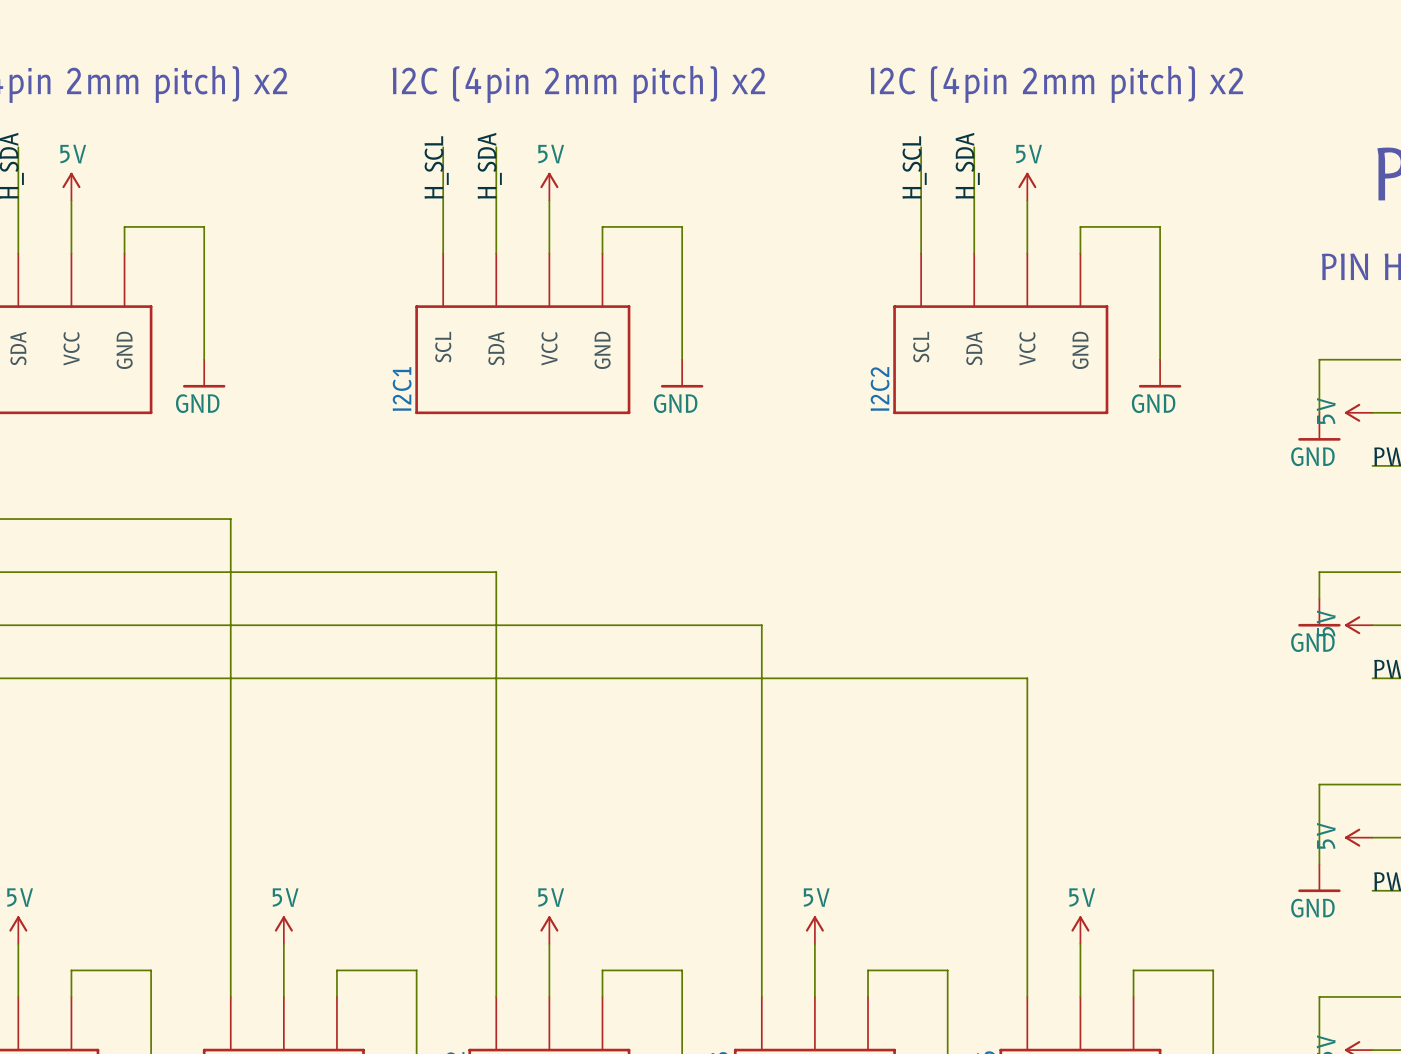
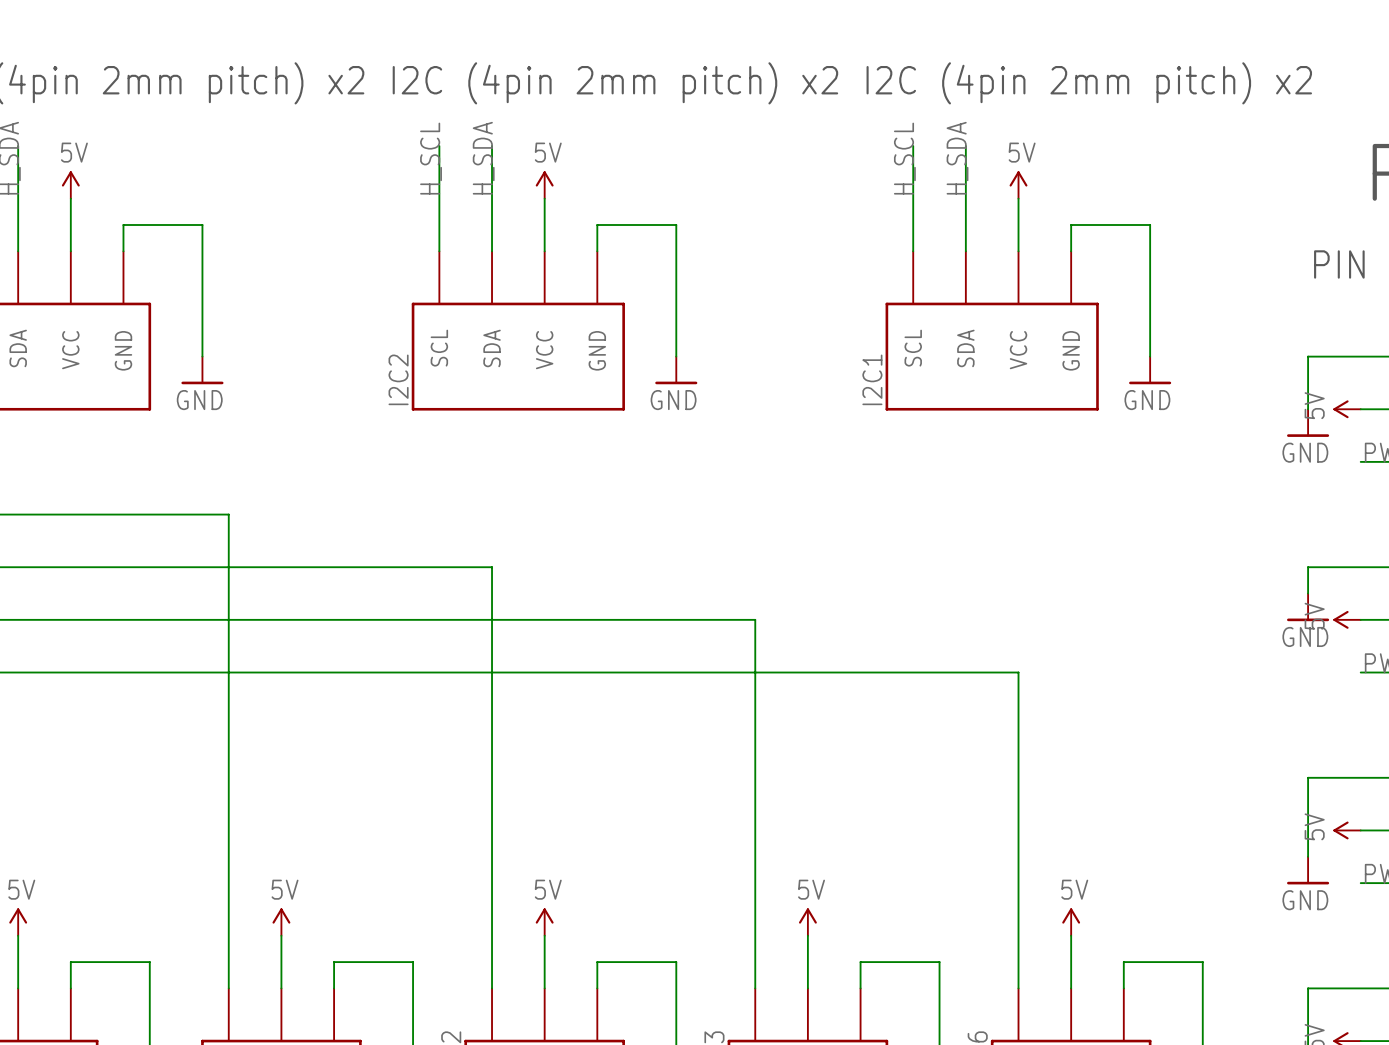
I2C1 name: I2C1 (402, 389) -> I2C2 (398, 379)
I2C2 name: I2C2 (880, 389) -> I2C1 (872, 379)

